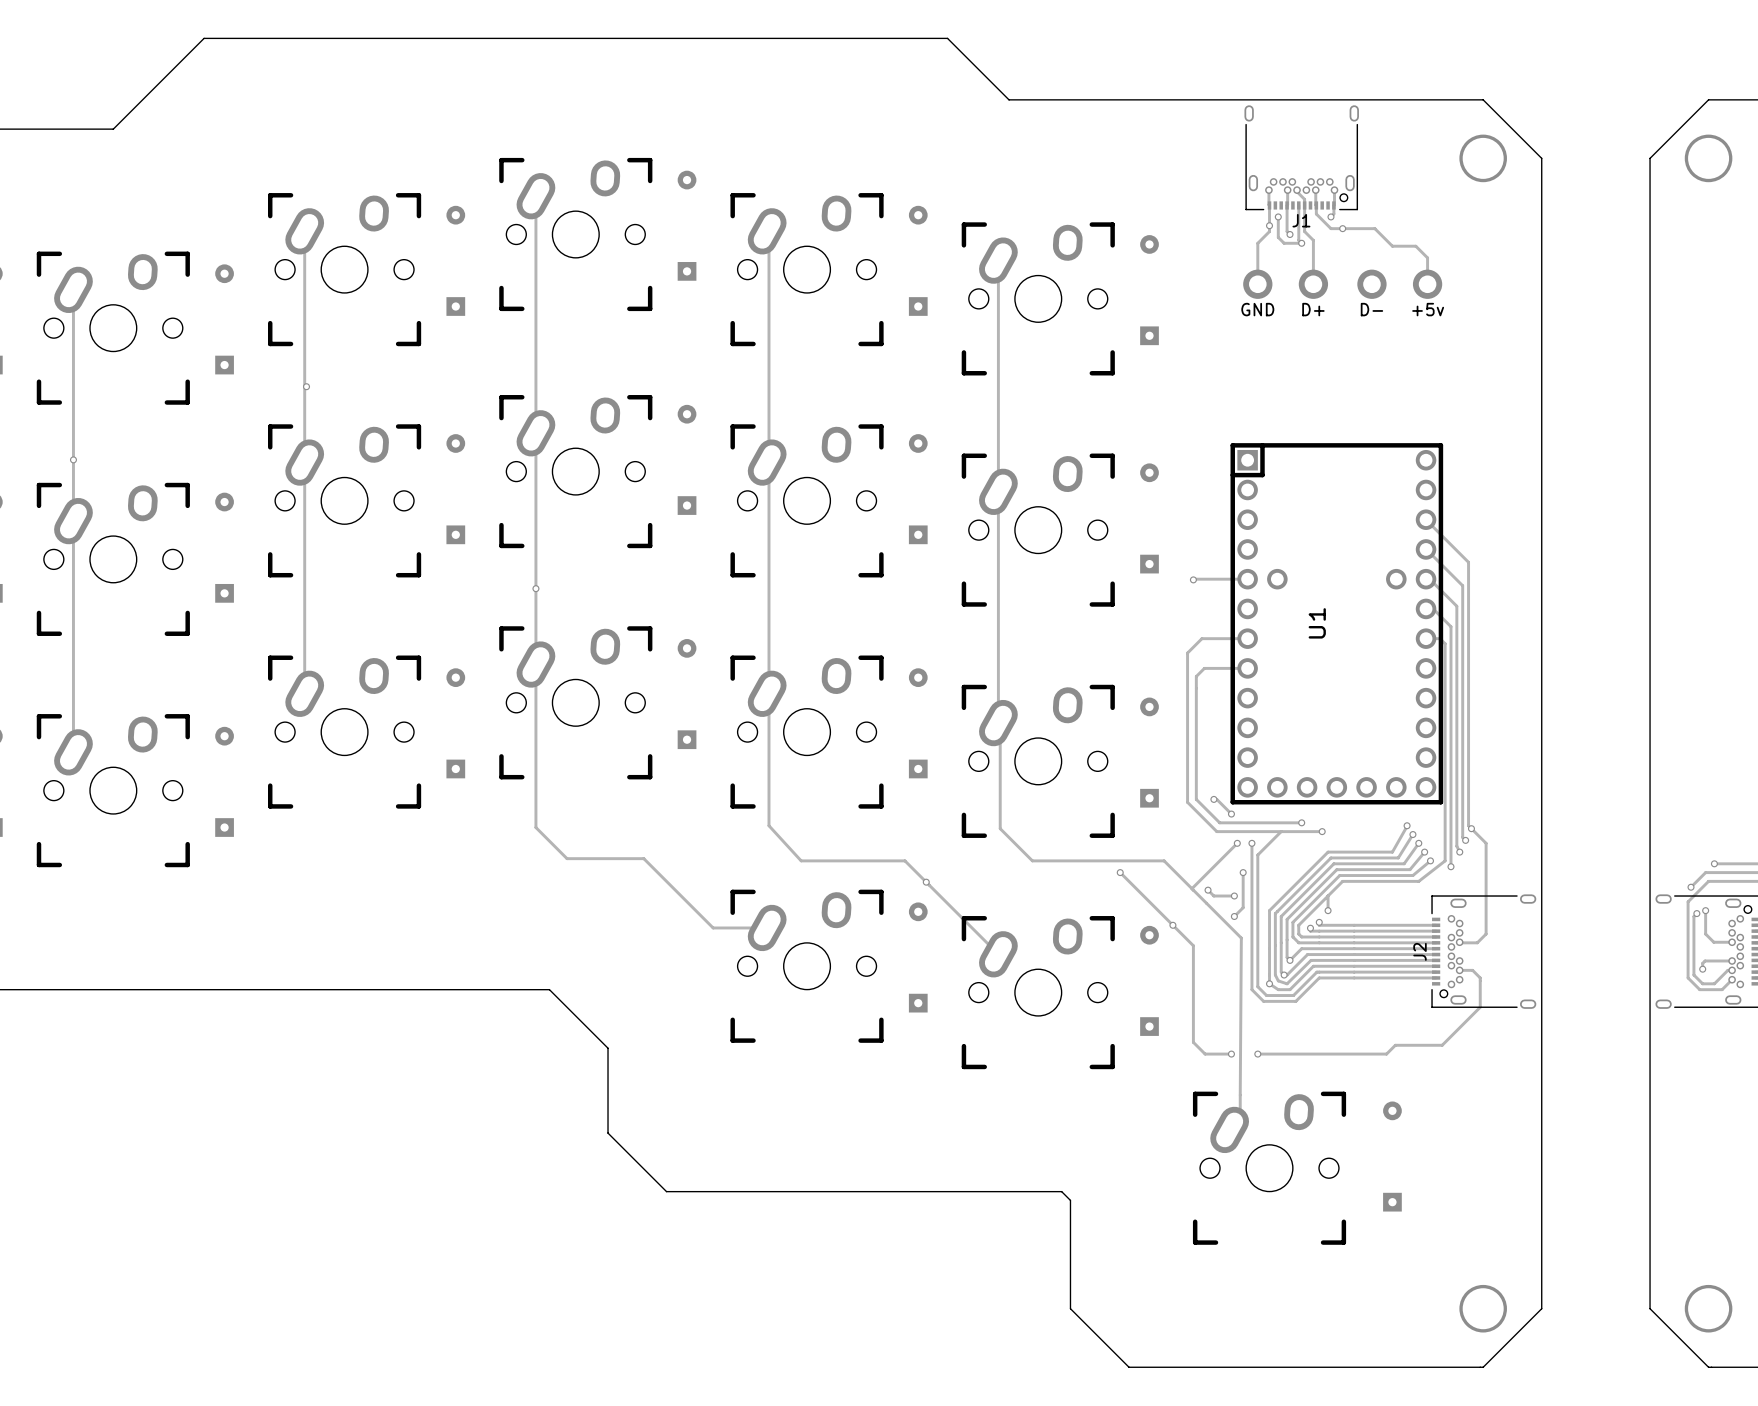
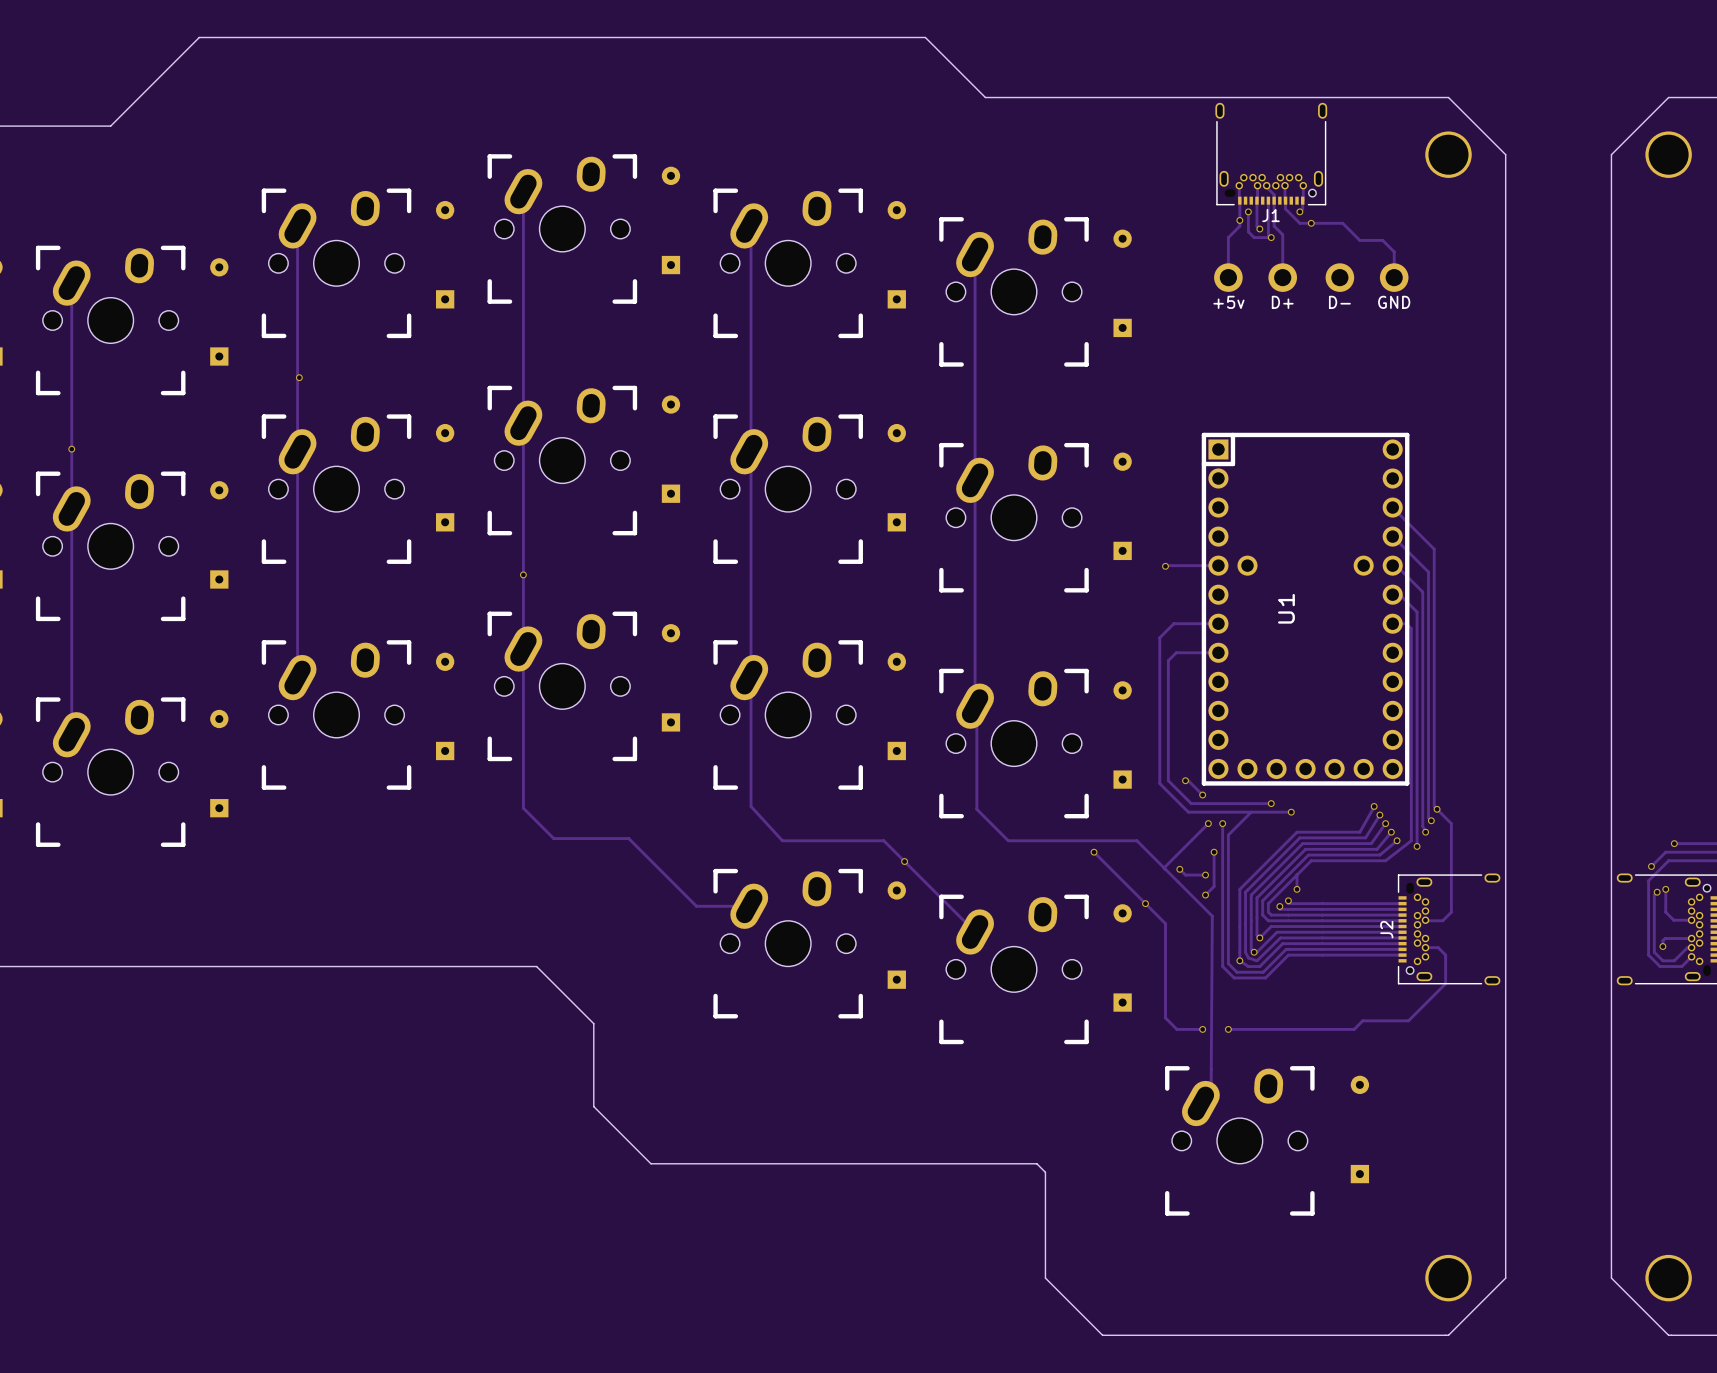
part value: GND (1257, 309) -> +5v (1228, 302)
part value: +5v (1428, 309) -> GND (1394, 302)

